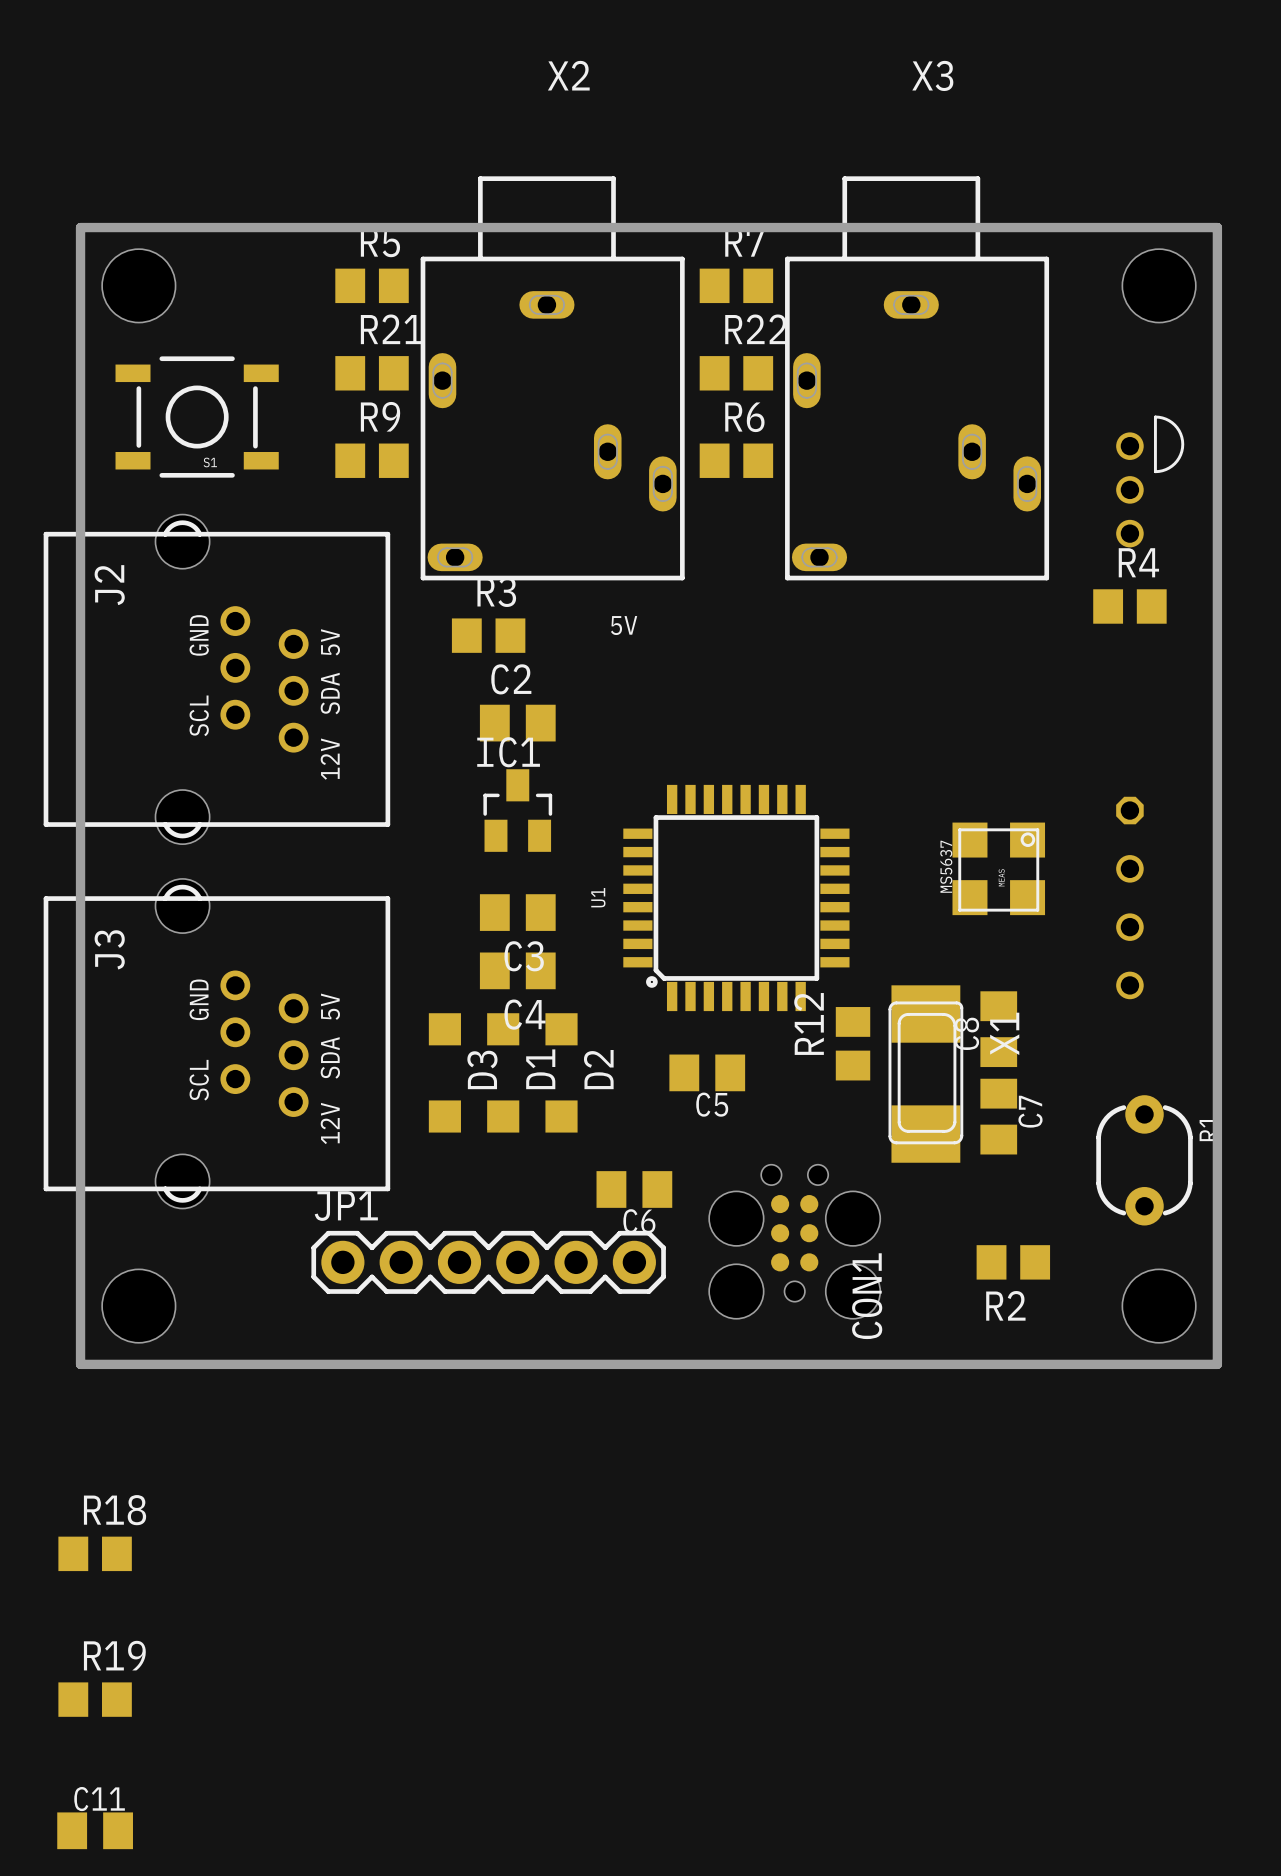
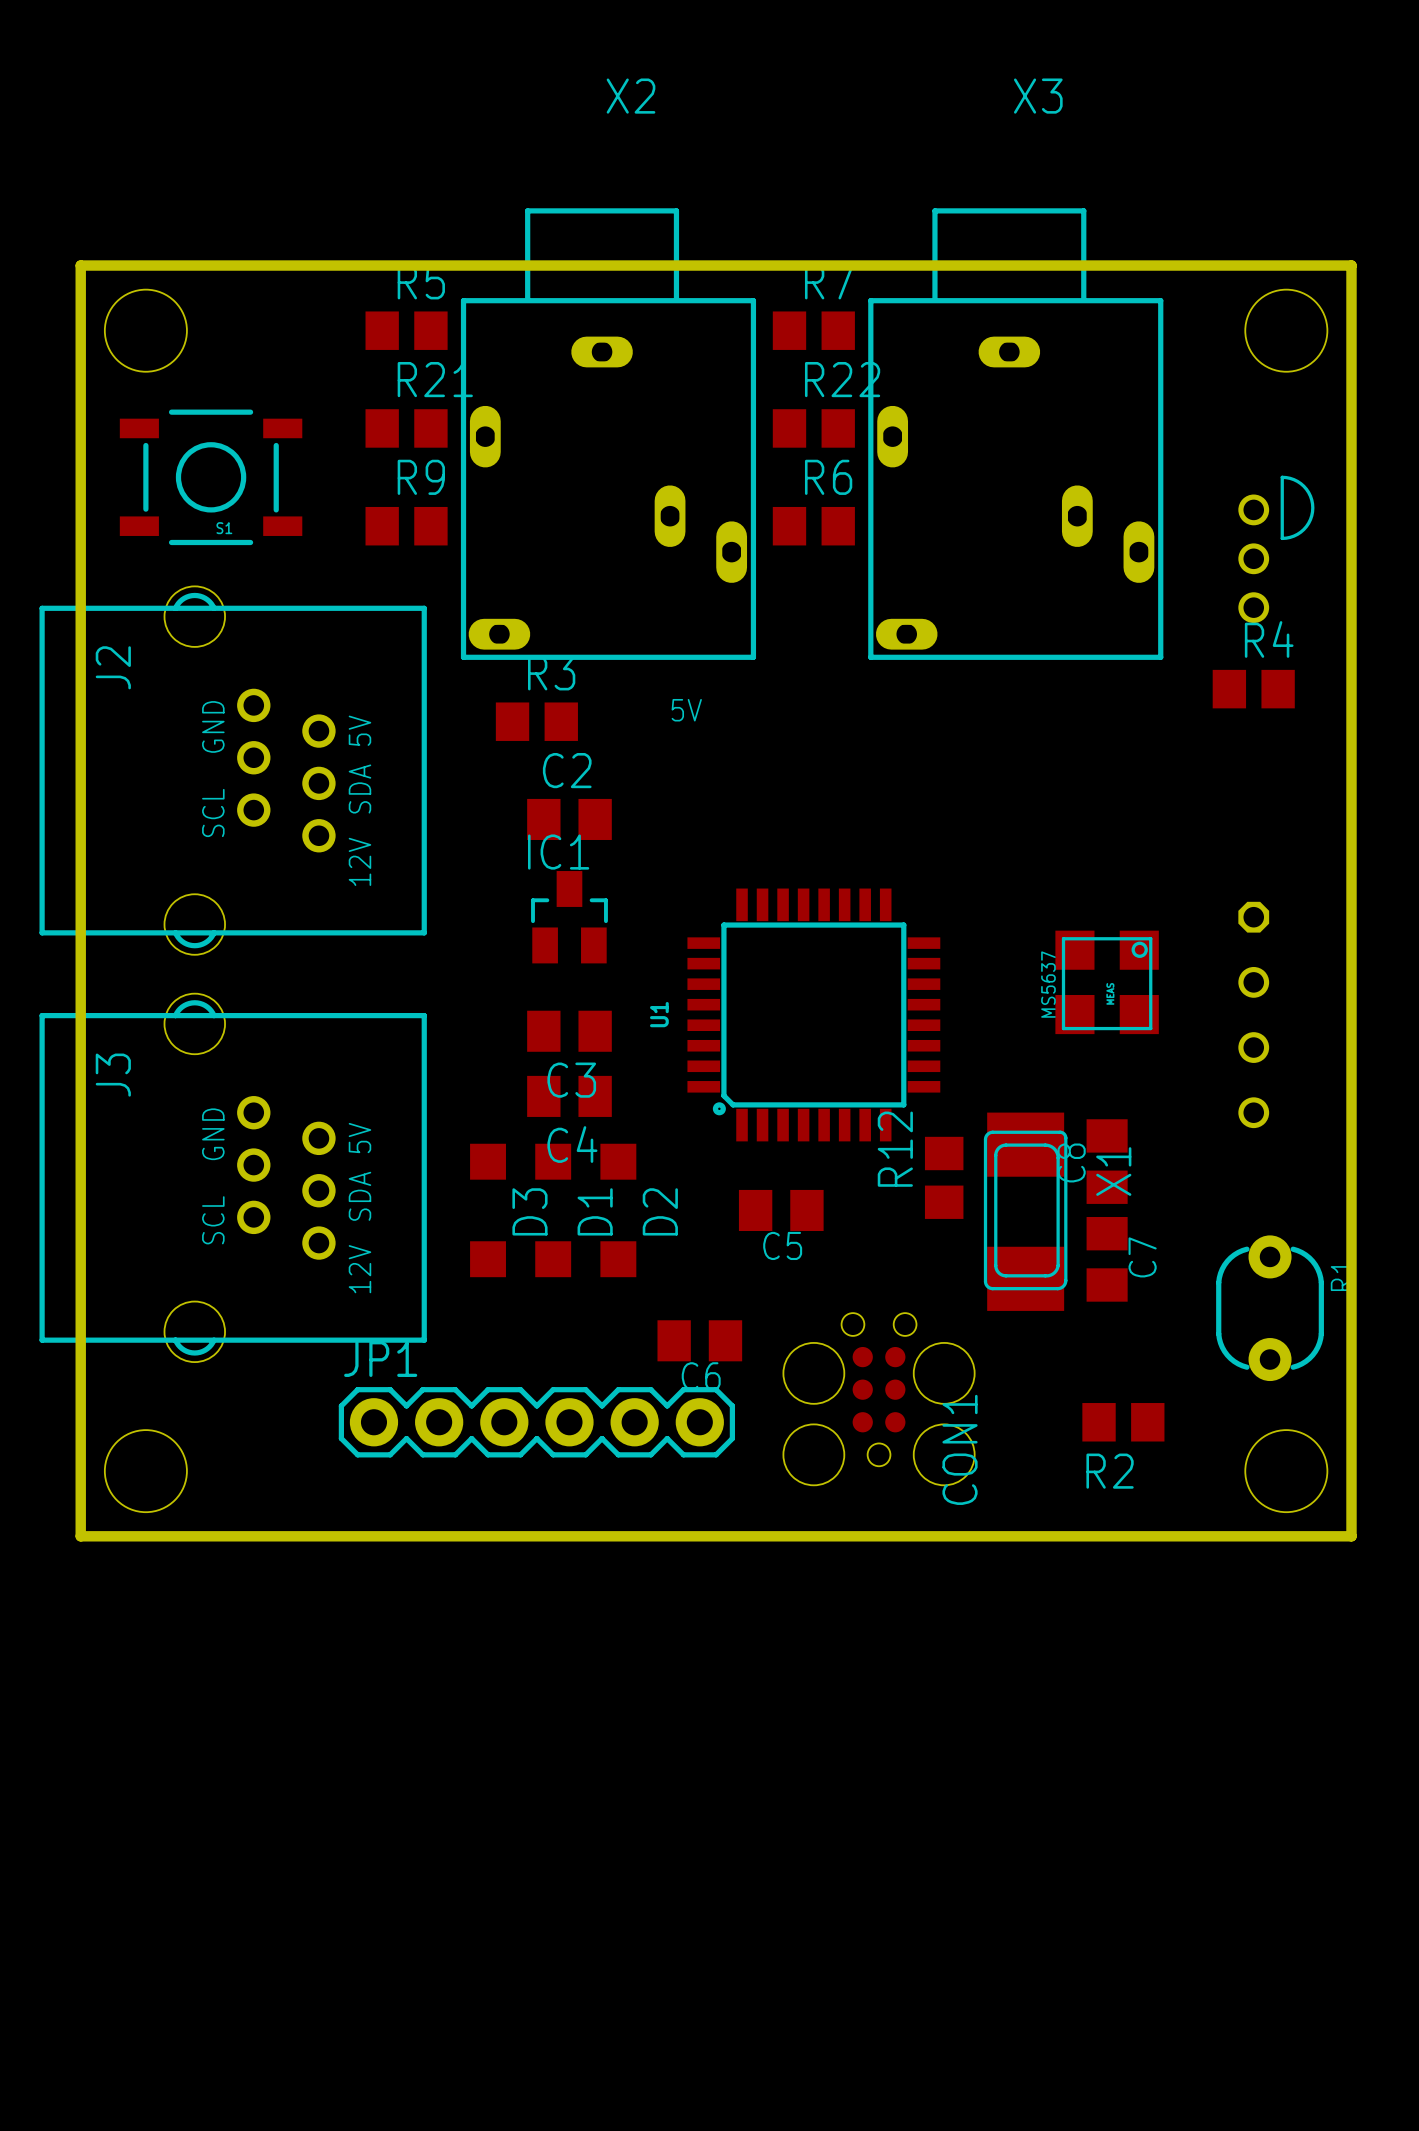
R18: (95, 1553) -> none
R19: (95, 1699) -> none
C11: (95, 1830) -> none

